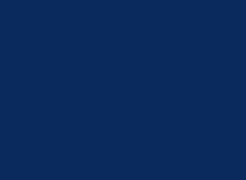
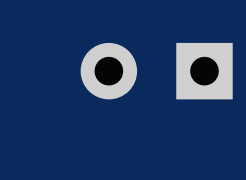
part: none -> (156, 71)

